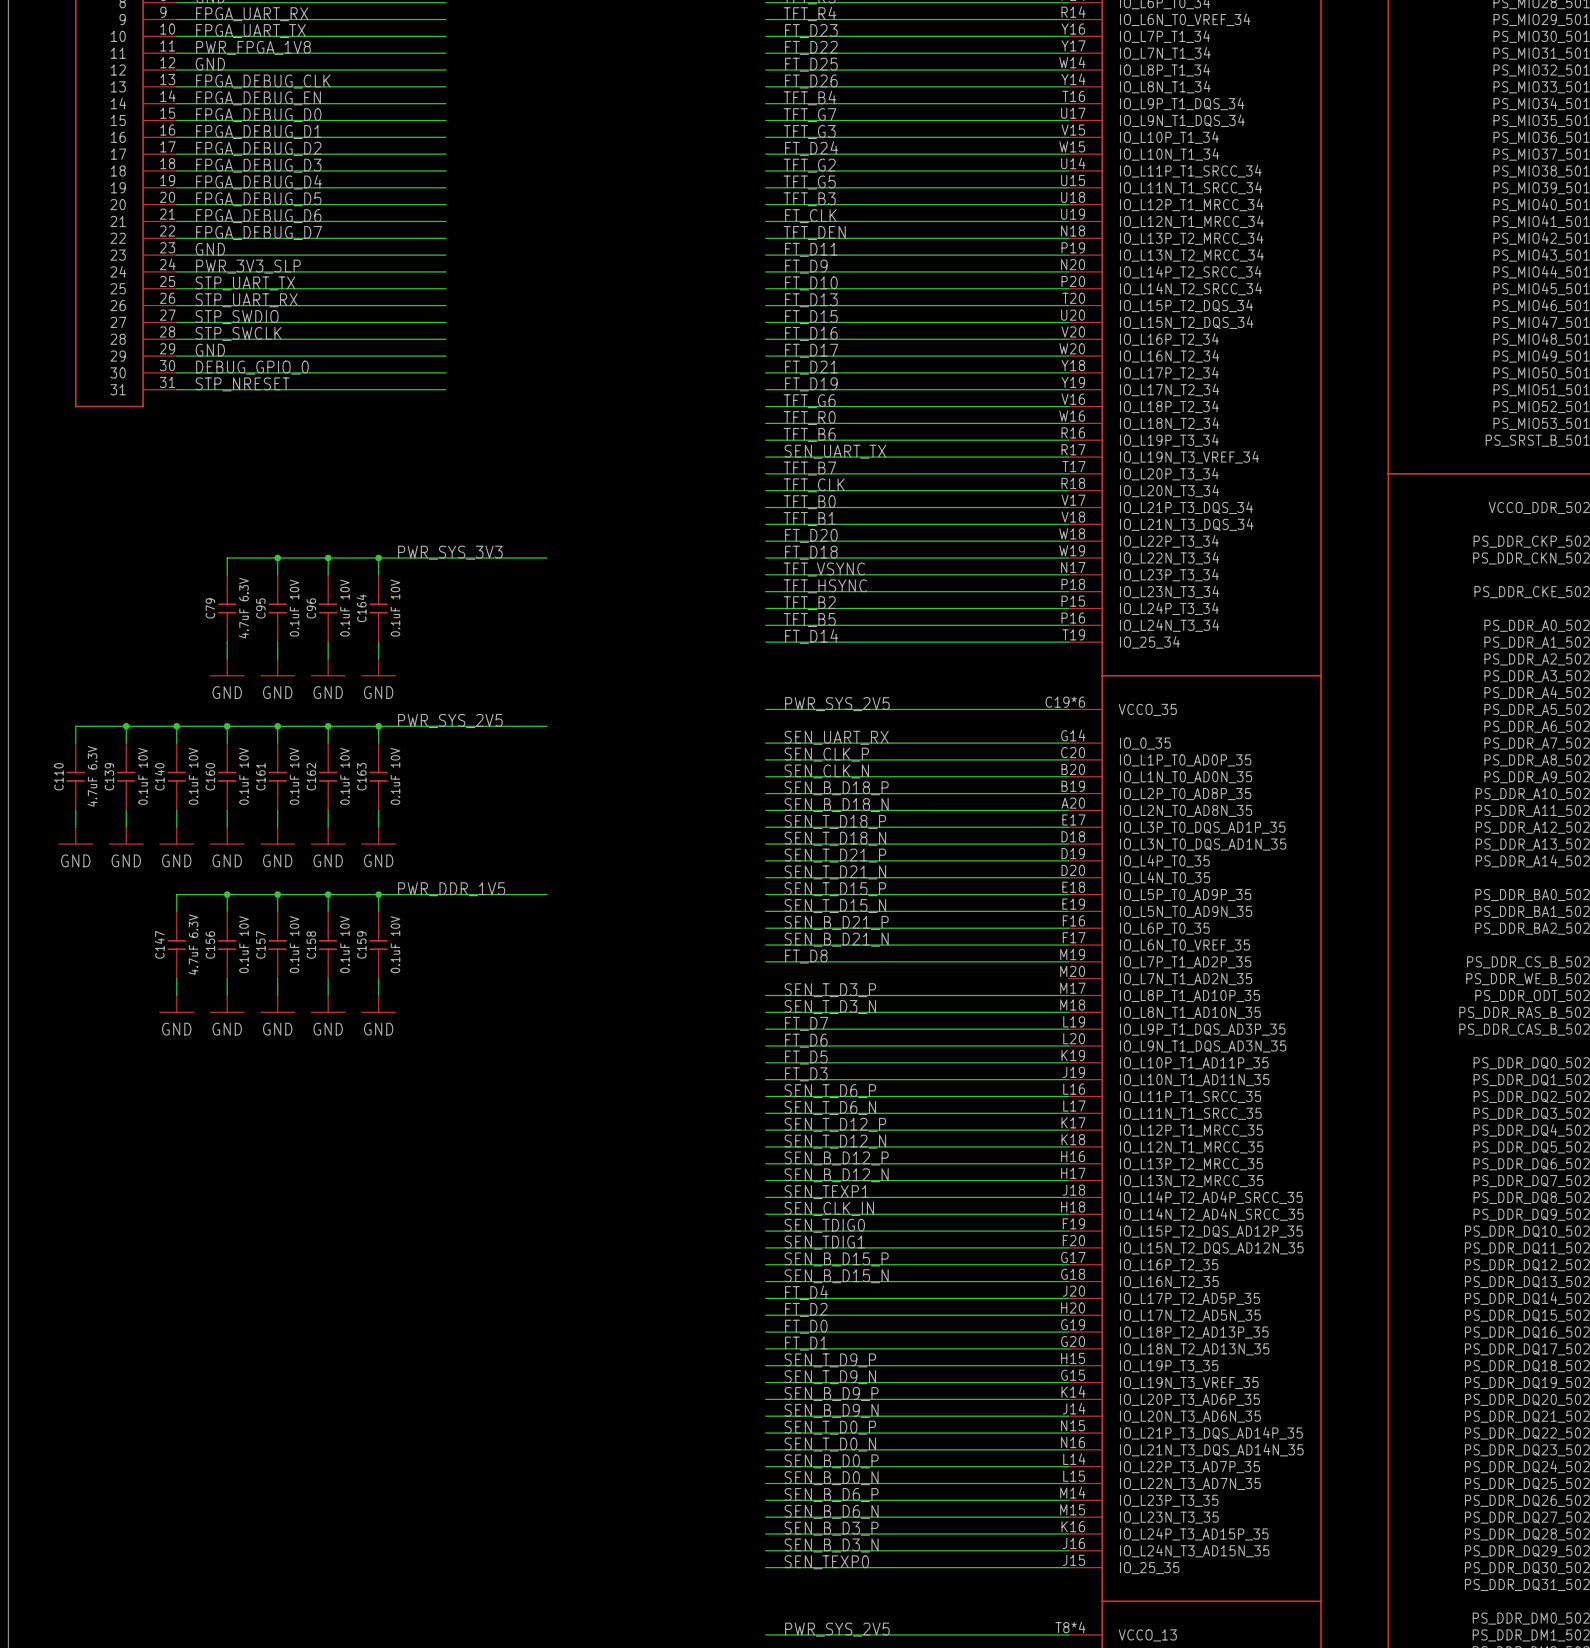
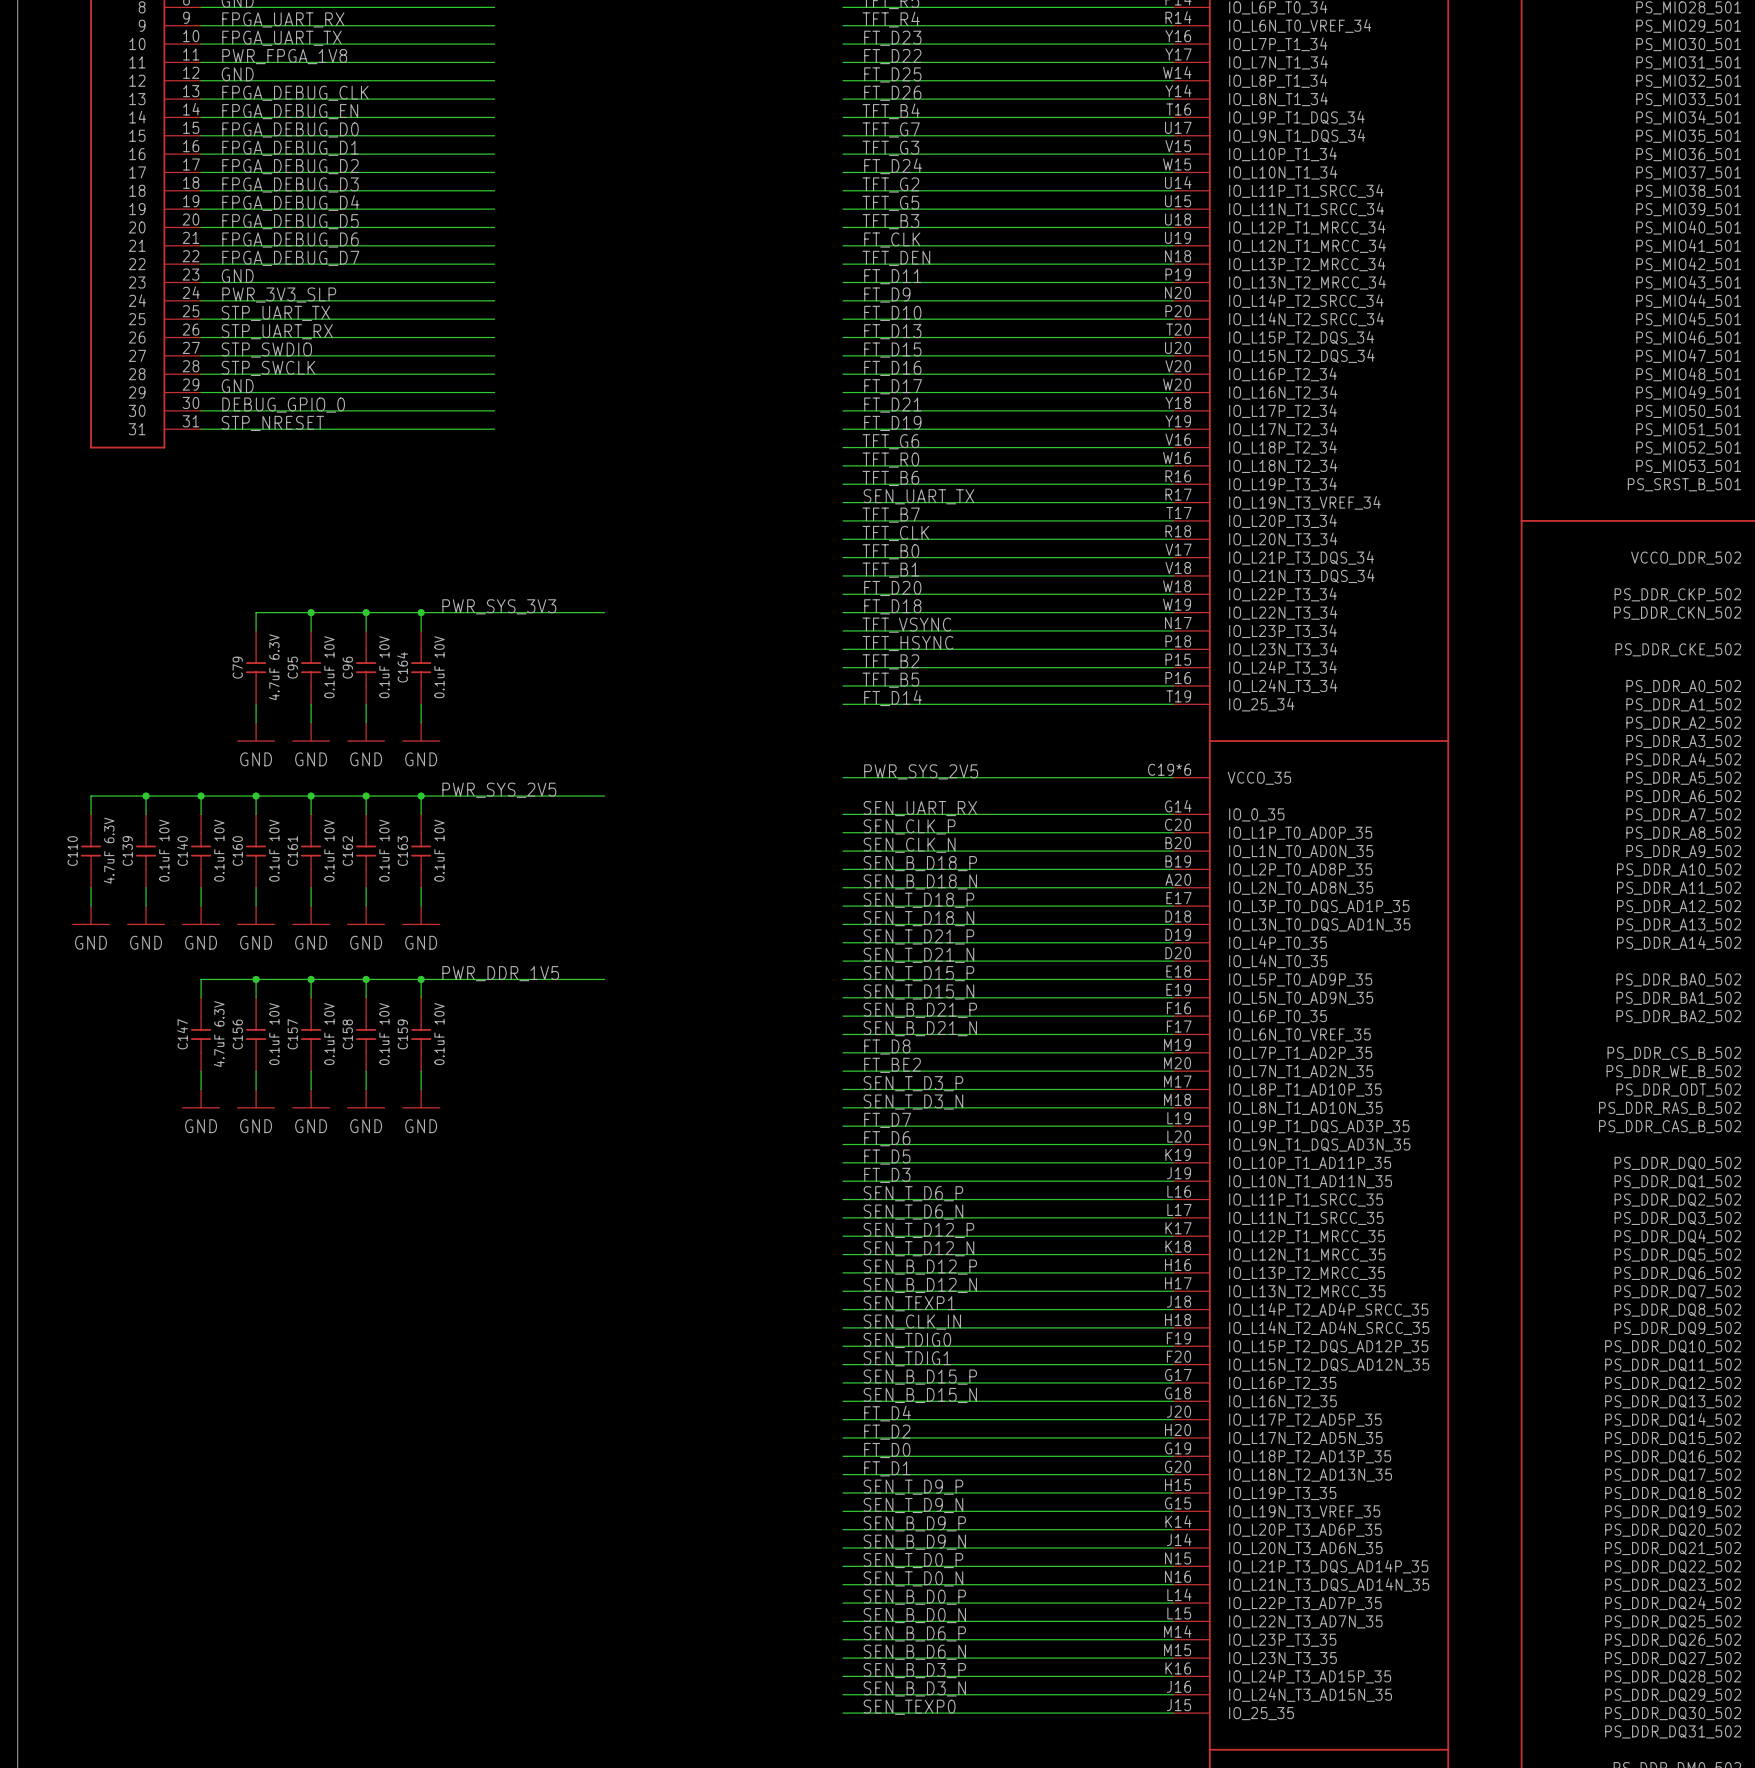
label: none -> FT_BE2 (892, 1065)
wire: none -> (842, 1071) (1173, 1071)

